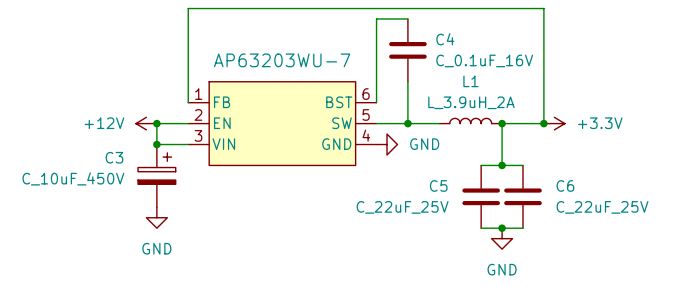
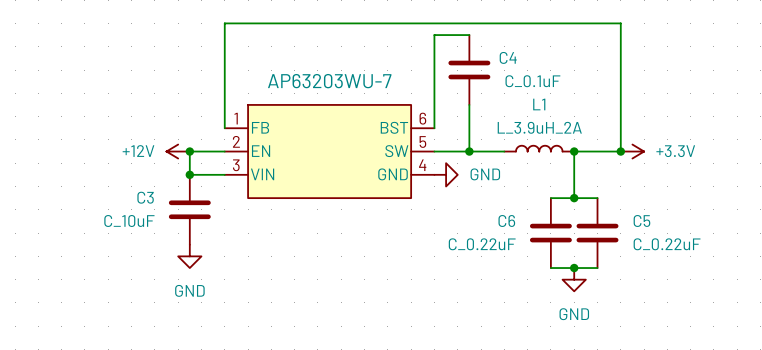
C4 value: C_0.1uF_16V (484, 60) -> C_0.1uF (532, 81)
C3 symbol: [138, 144, 176, 208] -> [168, 174, 211, 245]
C3 value: C_10uF_450V (73, 178) -> C_10uF (129, 220)
C5 name: C5 (438, 185) -> C6 (506, 220)
C6 name: C6 (565, 185) -> C5 (641, 220)
C5 value: C_22uF_25V (402, 207) -> C_0.22uF (482, 244)
C6 value: C_22uF_25V (602, 207) -> C_0.22uF (667, 244)

